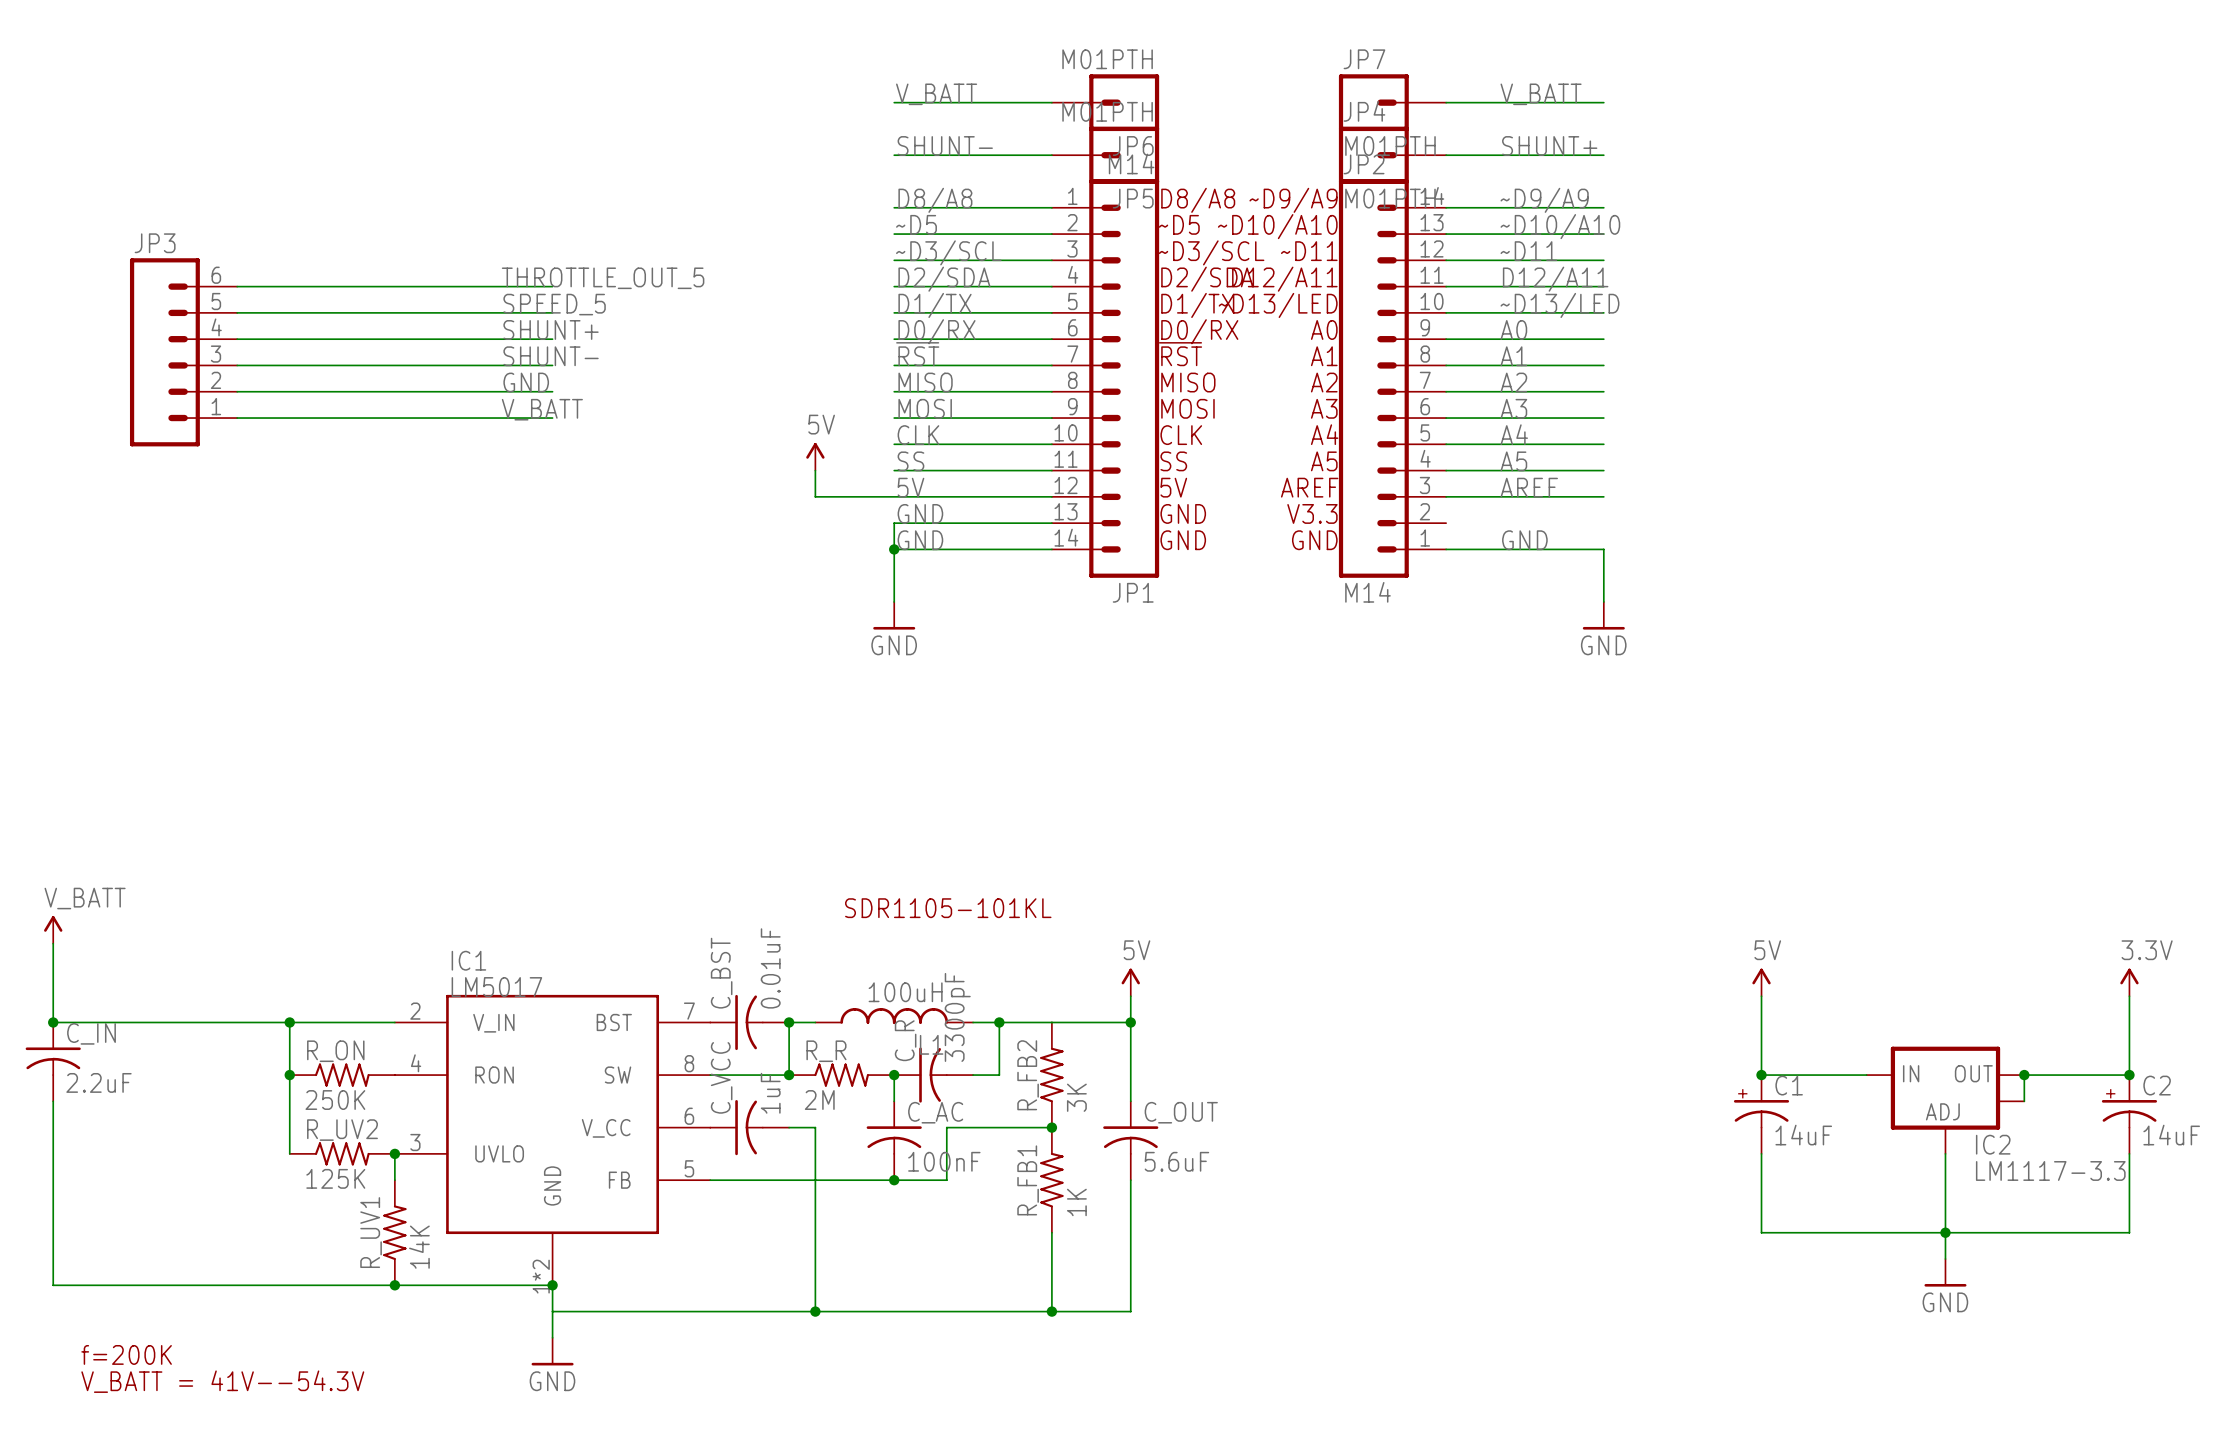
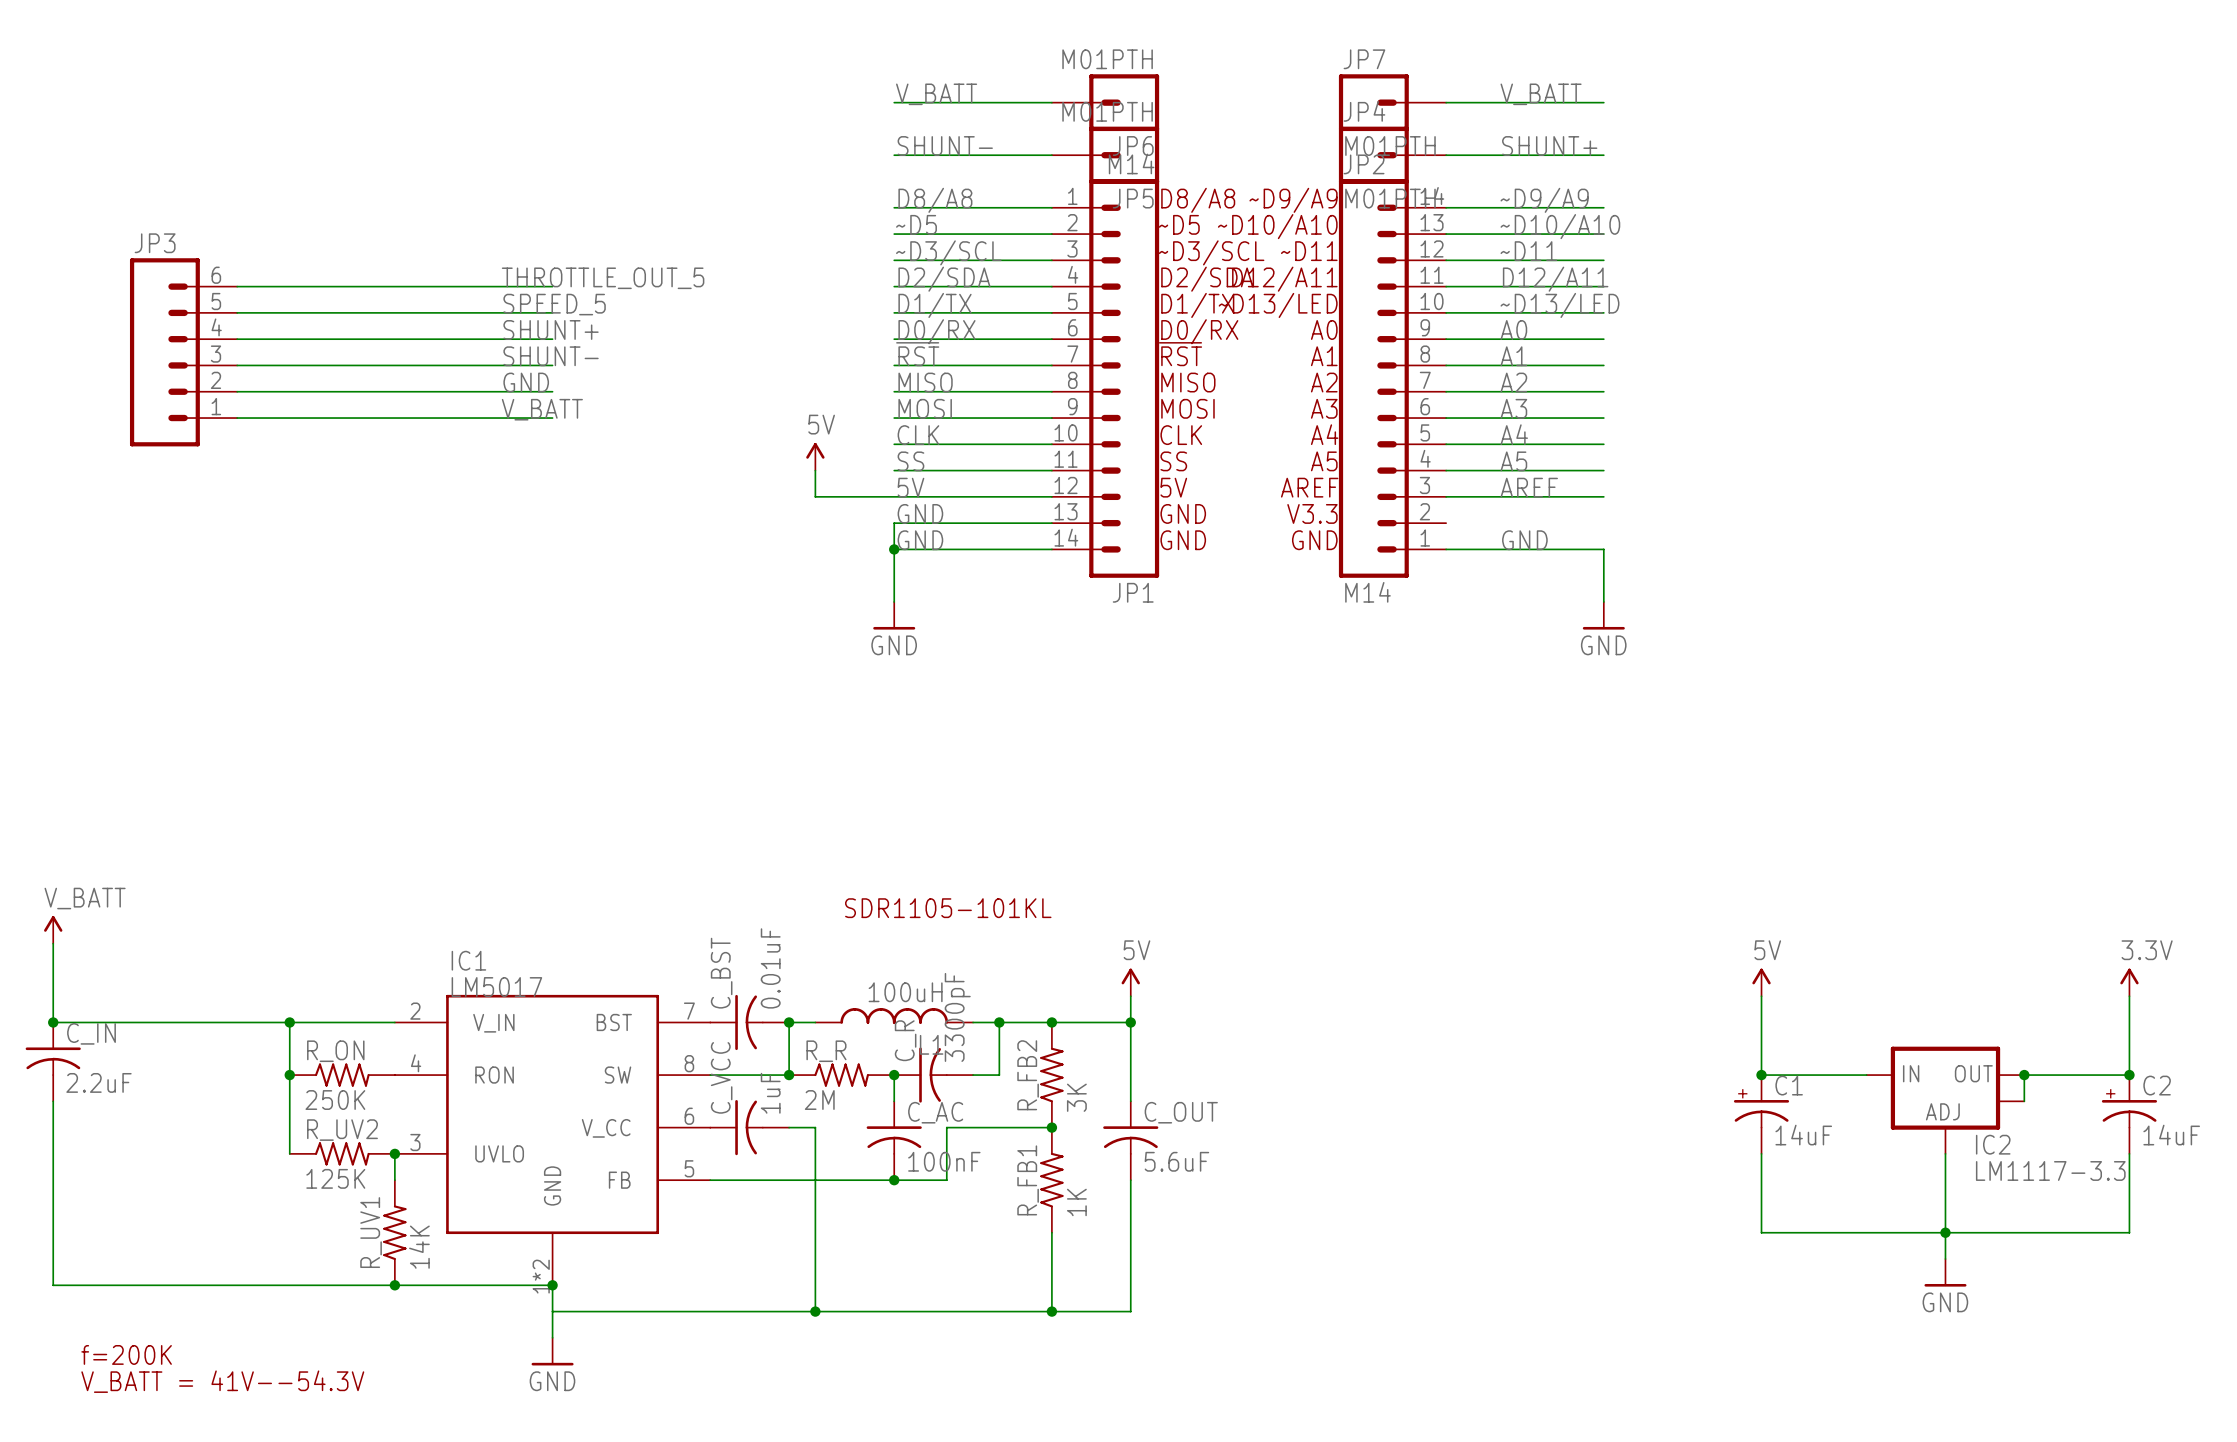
junction: none -> (1051, 1022)

